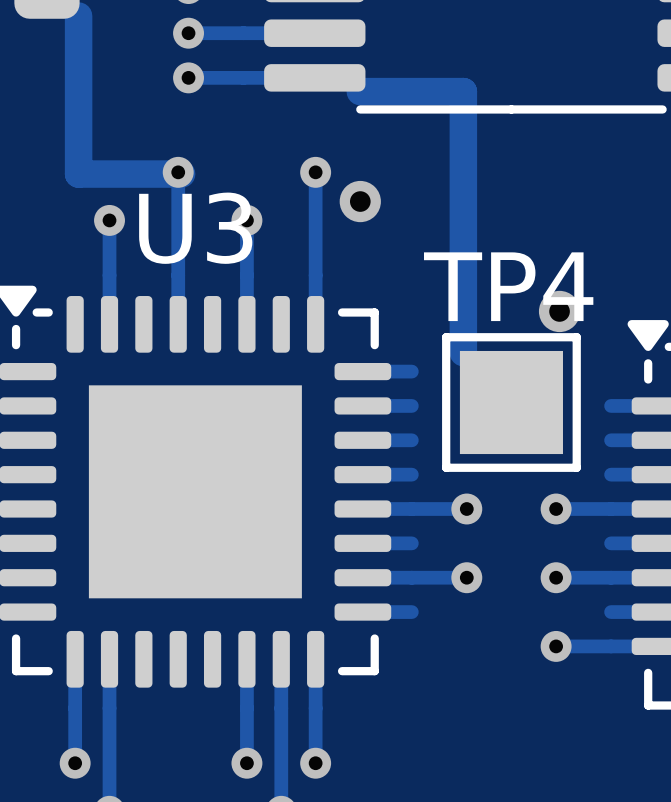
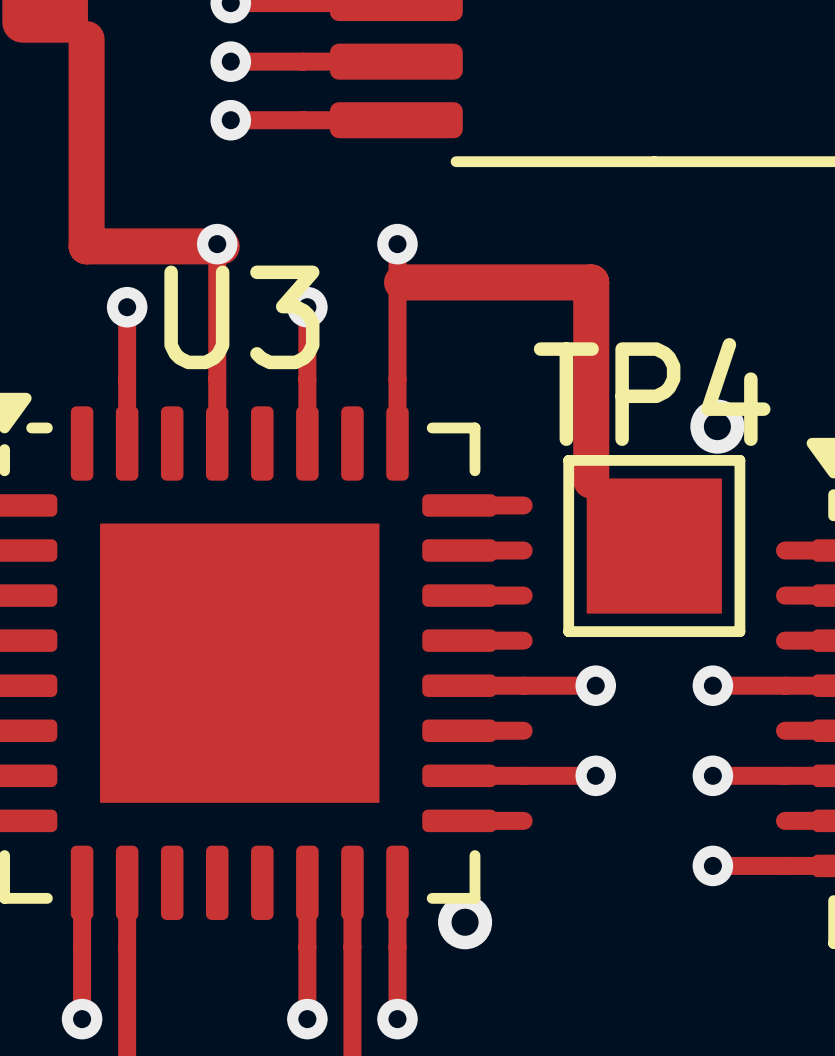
track: (360, 91) (463, 91) (463, 201) -> (401, 282) (591, 282)
via: (360, 201) -> none
via: none -> (465, 922)

